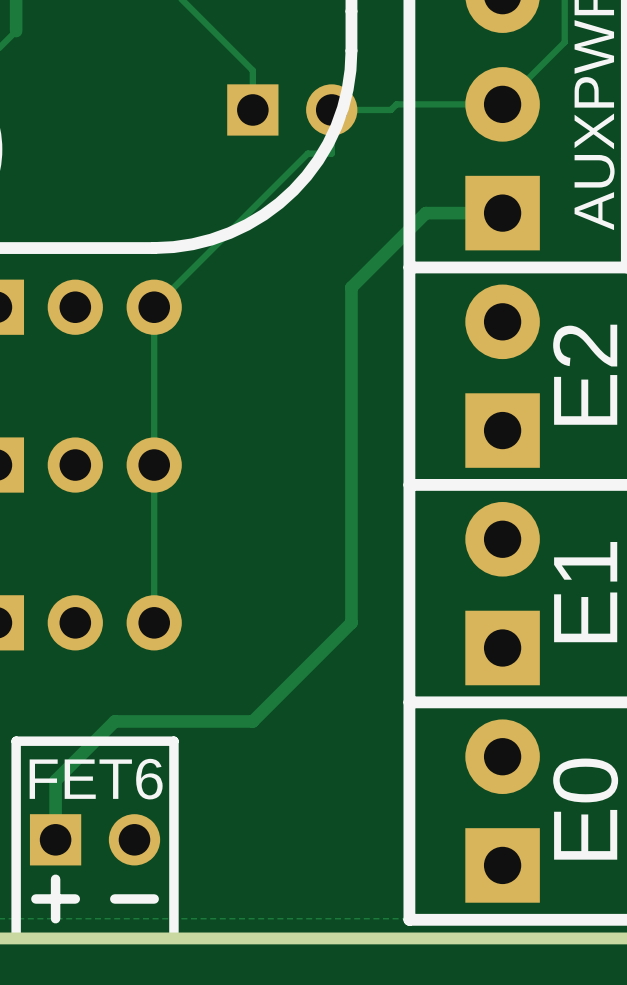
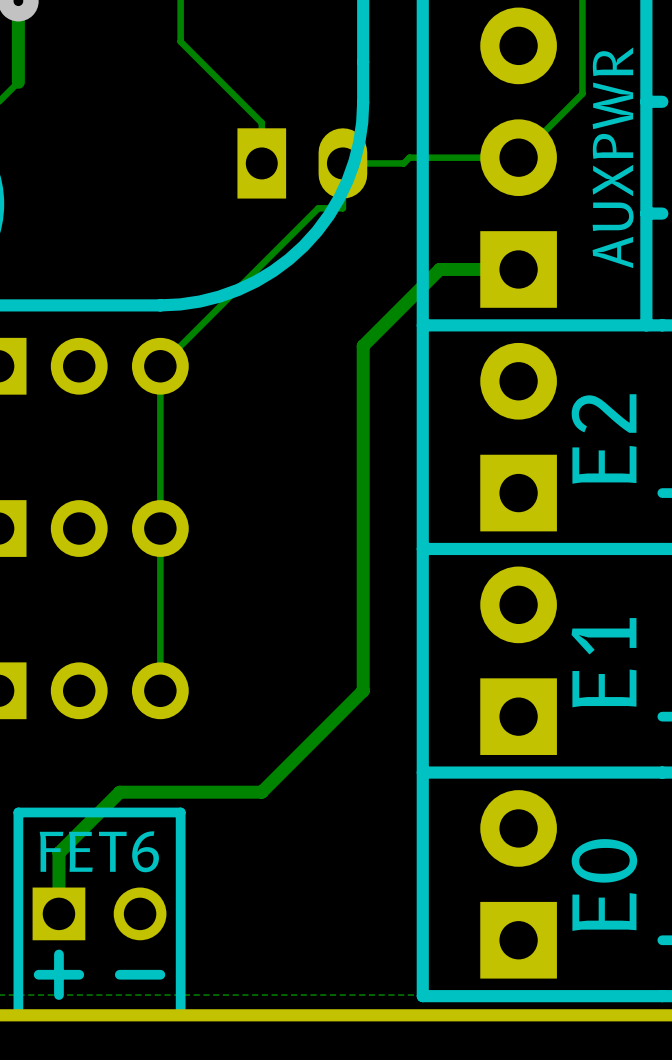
part footprint: [227, 84, 358, 136] -> [237, 128, 368, 199]

